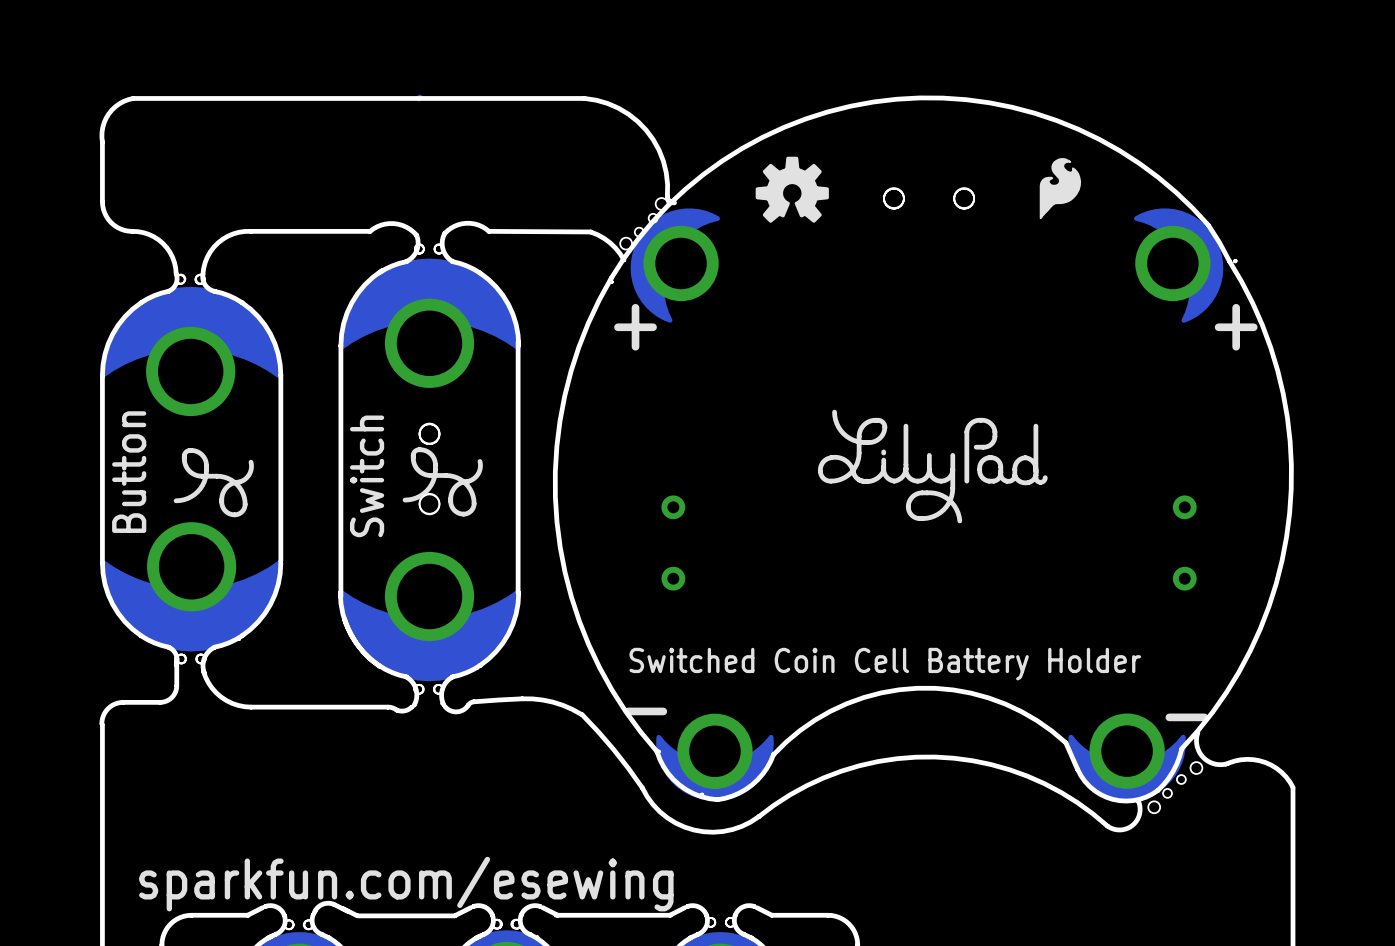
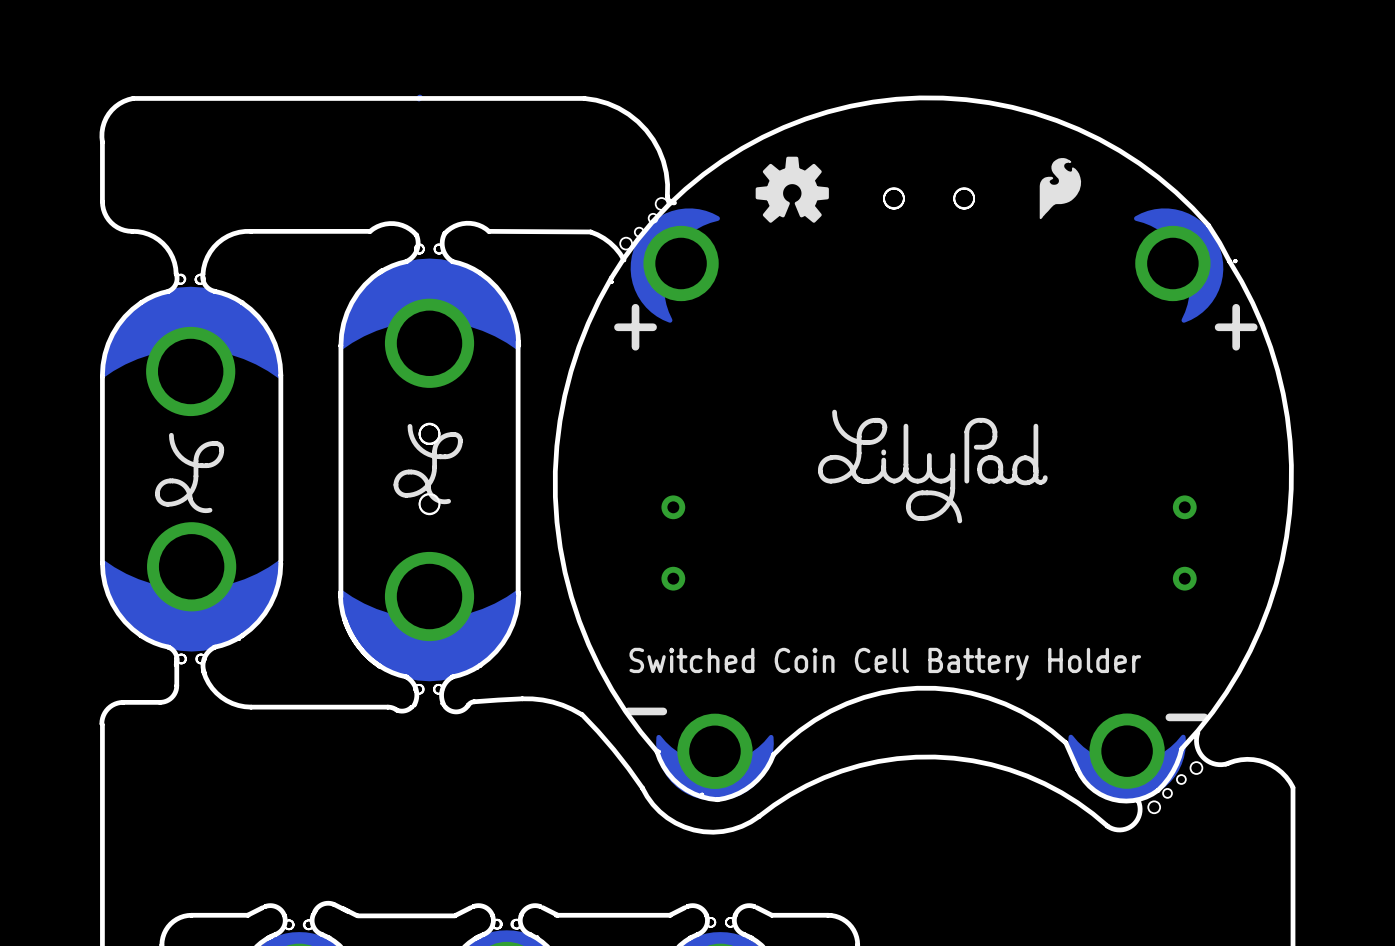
drawing: none -> [154, 432, 225, 514]
drawing shape: [402, 447, 483, 517] -> [393, 423, 463, 505]
drawing: [173, 448, 254, 518] -> none
text: Button (129, 472) -> none
text: Switch (367, 476) -> none
text: sparkfun.com/esewing (406, 884) -> none

